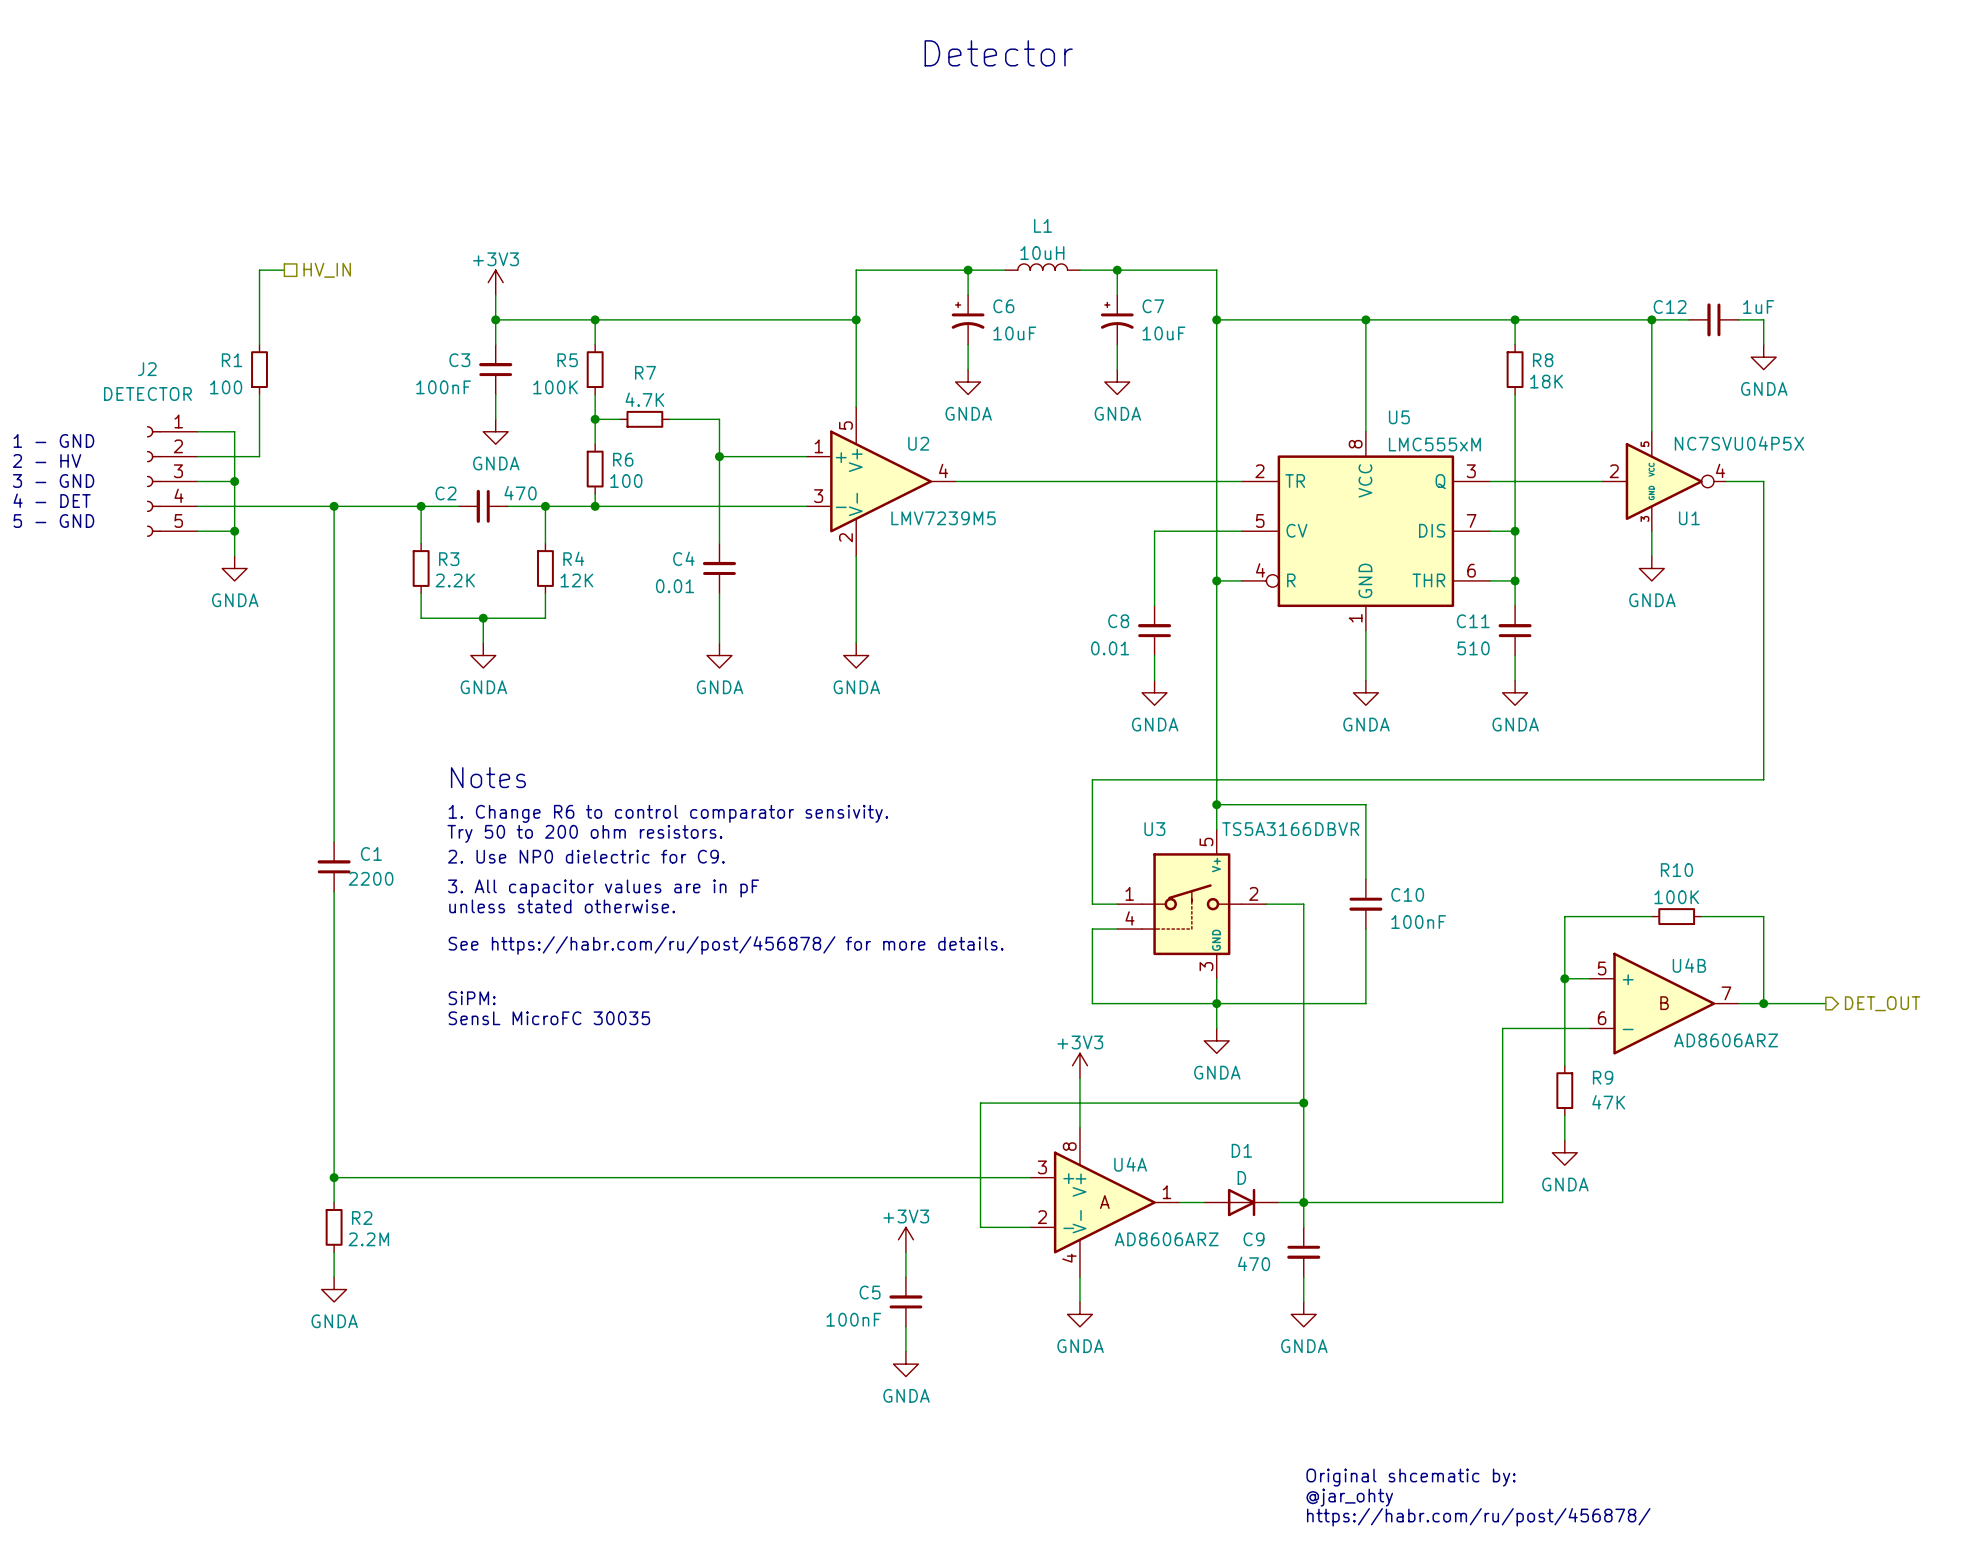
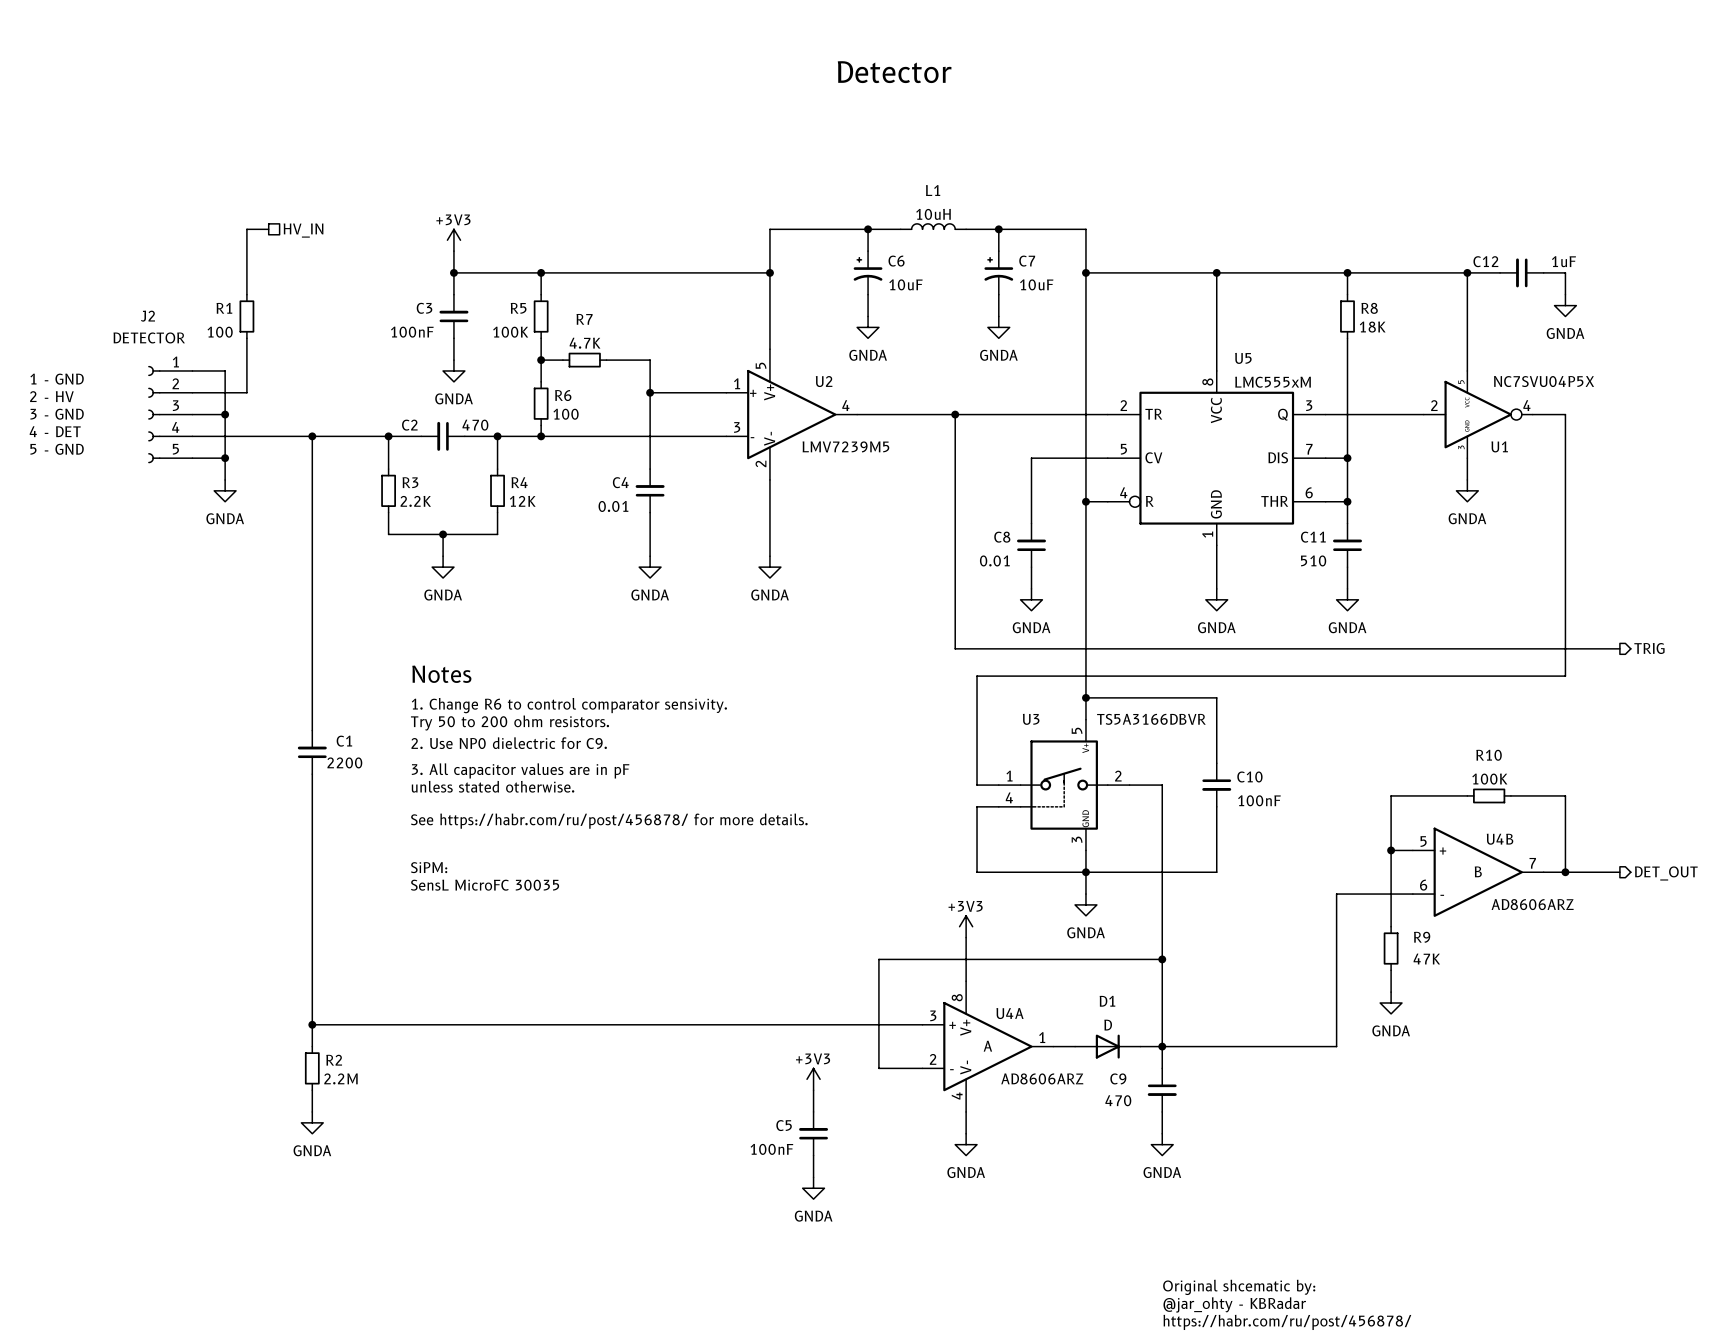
text position: Detector (998, 53) -> Detector (894, 72)
wire: none -> (955, 414) (955, 648) (1619, 648)
junction: none -> (955, 414)
hierarchical label: none -> TRIG (1649, 648)
text: @jar_ohty (1349, 1497) -> @jar_ohty - KBRadar (1234, 1304)

